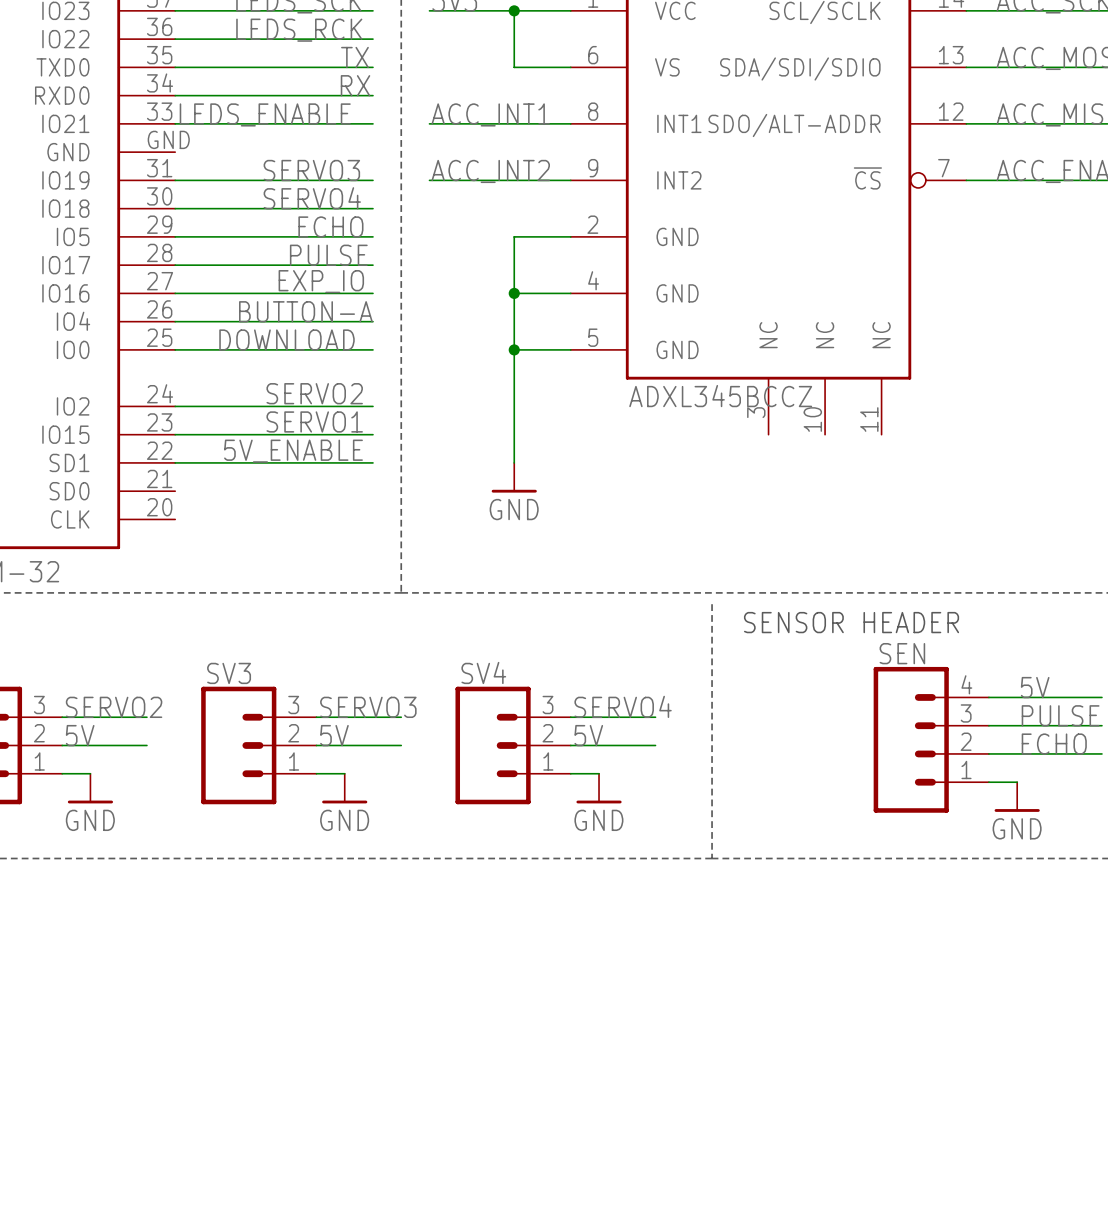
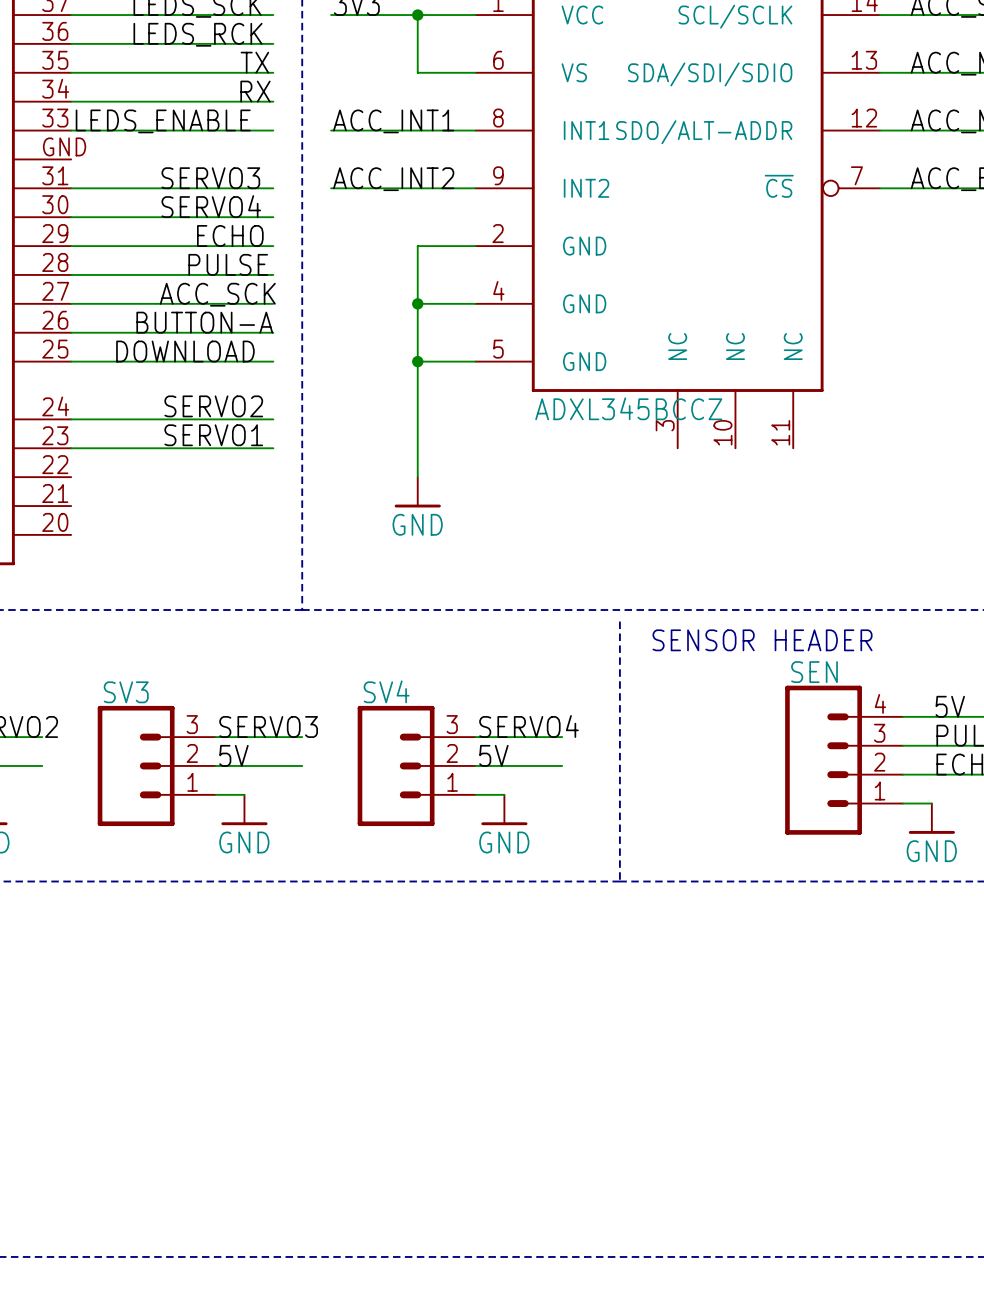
label: EXP_IO (321, 281) -> none
label: none -> ACC_SCK (217, 294)
label: 5V_ENABLE (293, 451) -> none
wire: (175, 462) (372, 462) -> none

